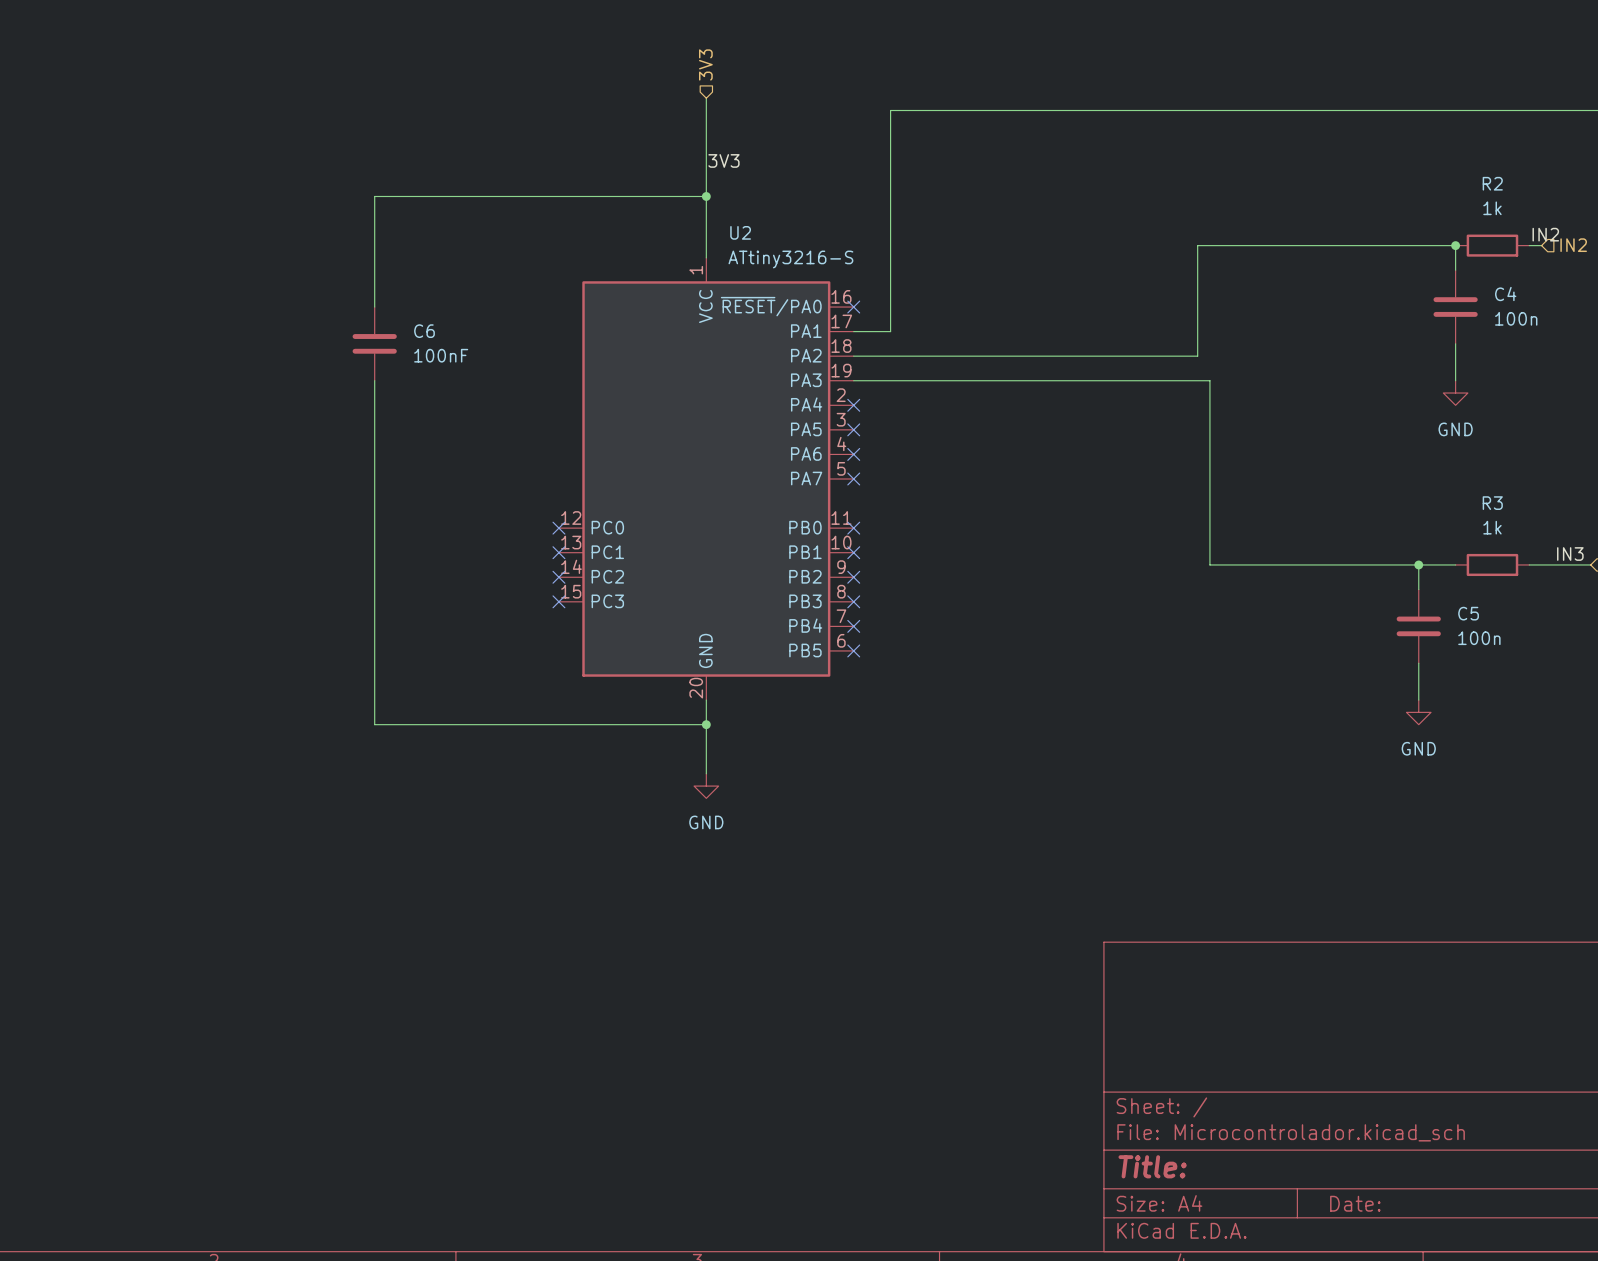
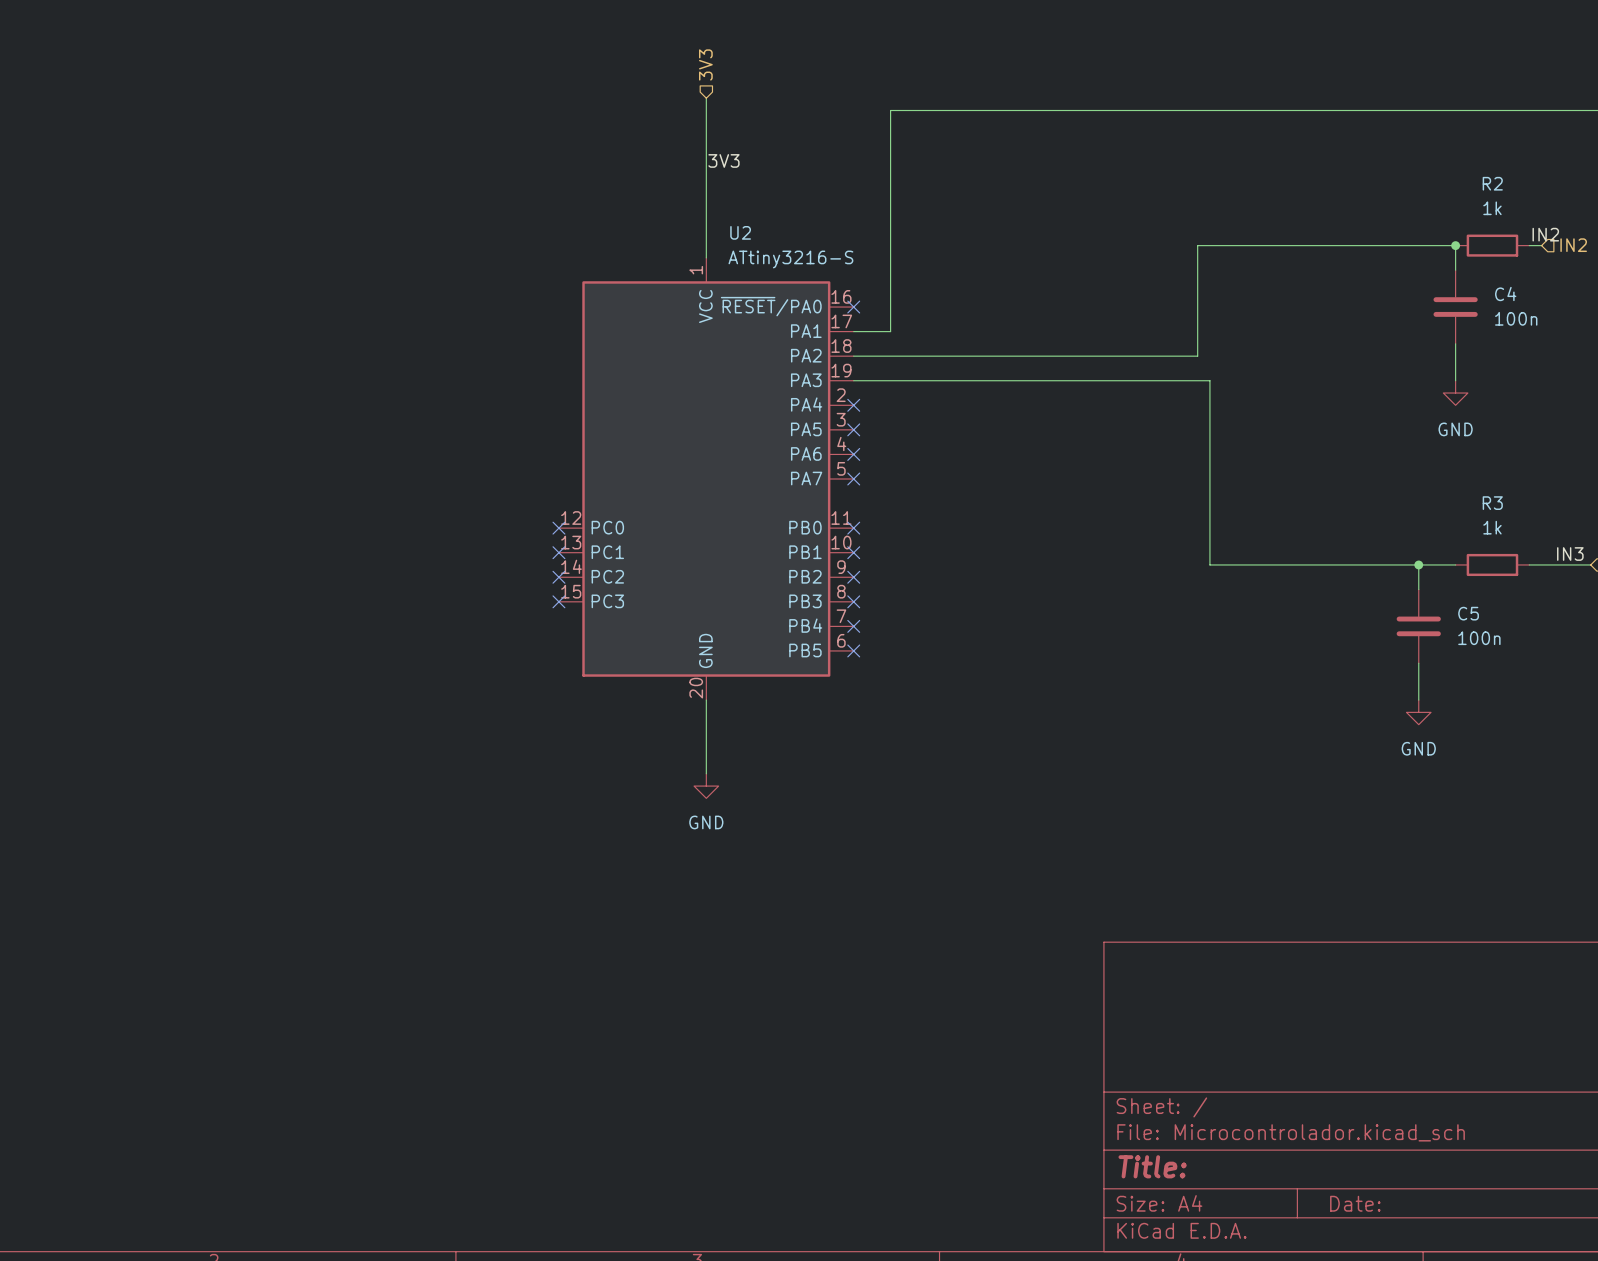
wire: (706, 196) (374, 196) (374, 307) -> none
junction: (706, 196) -> none
C6: 100nF (374, 343) -> none
wire: (374, 380) (374, 724) (706, 724) -> none
junction: (706, 724) -> none

